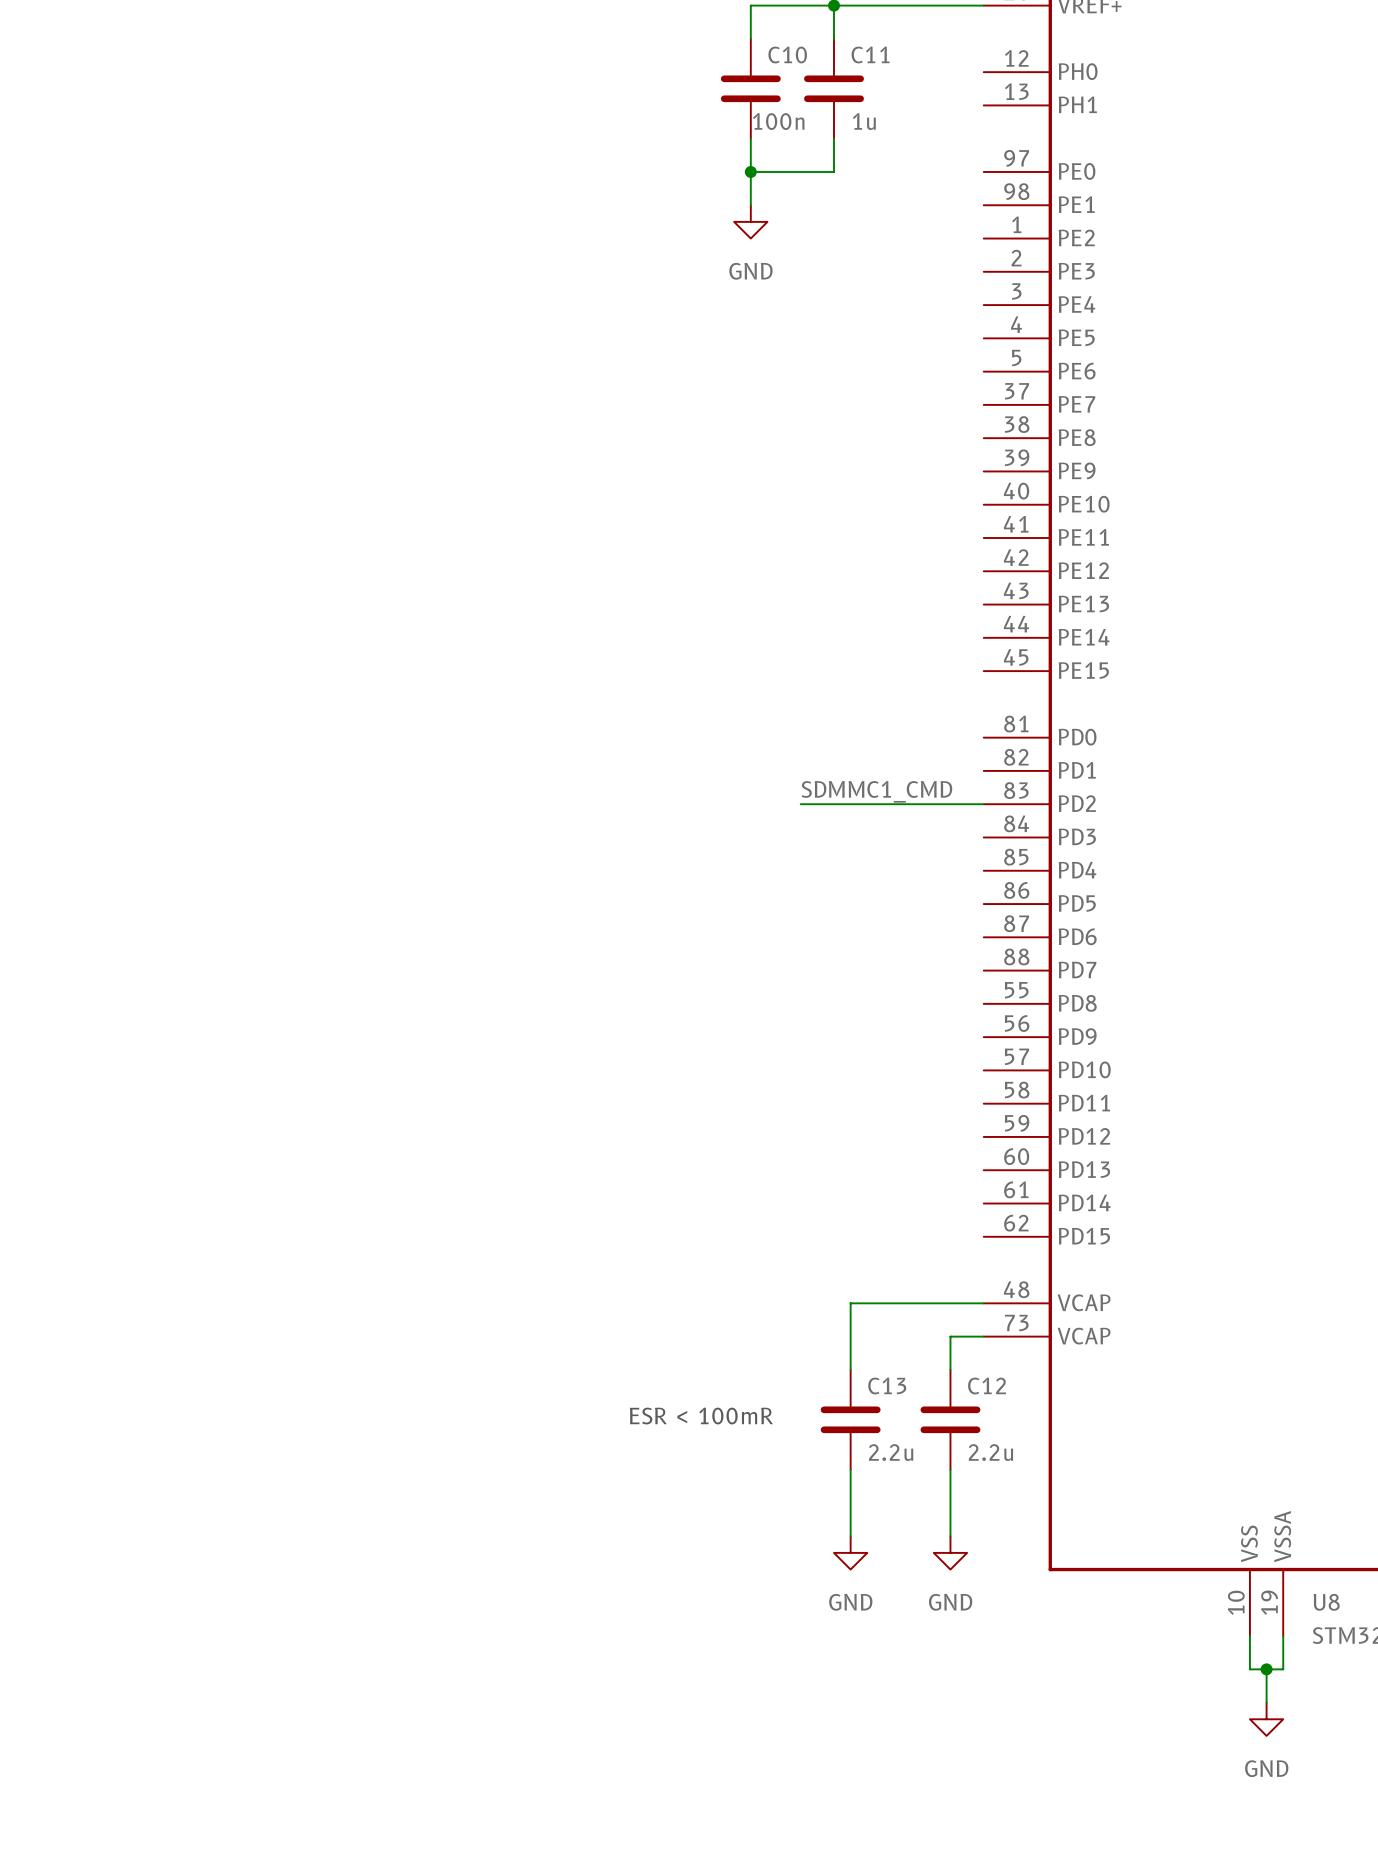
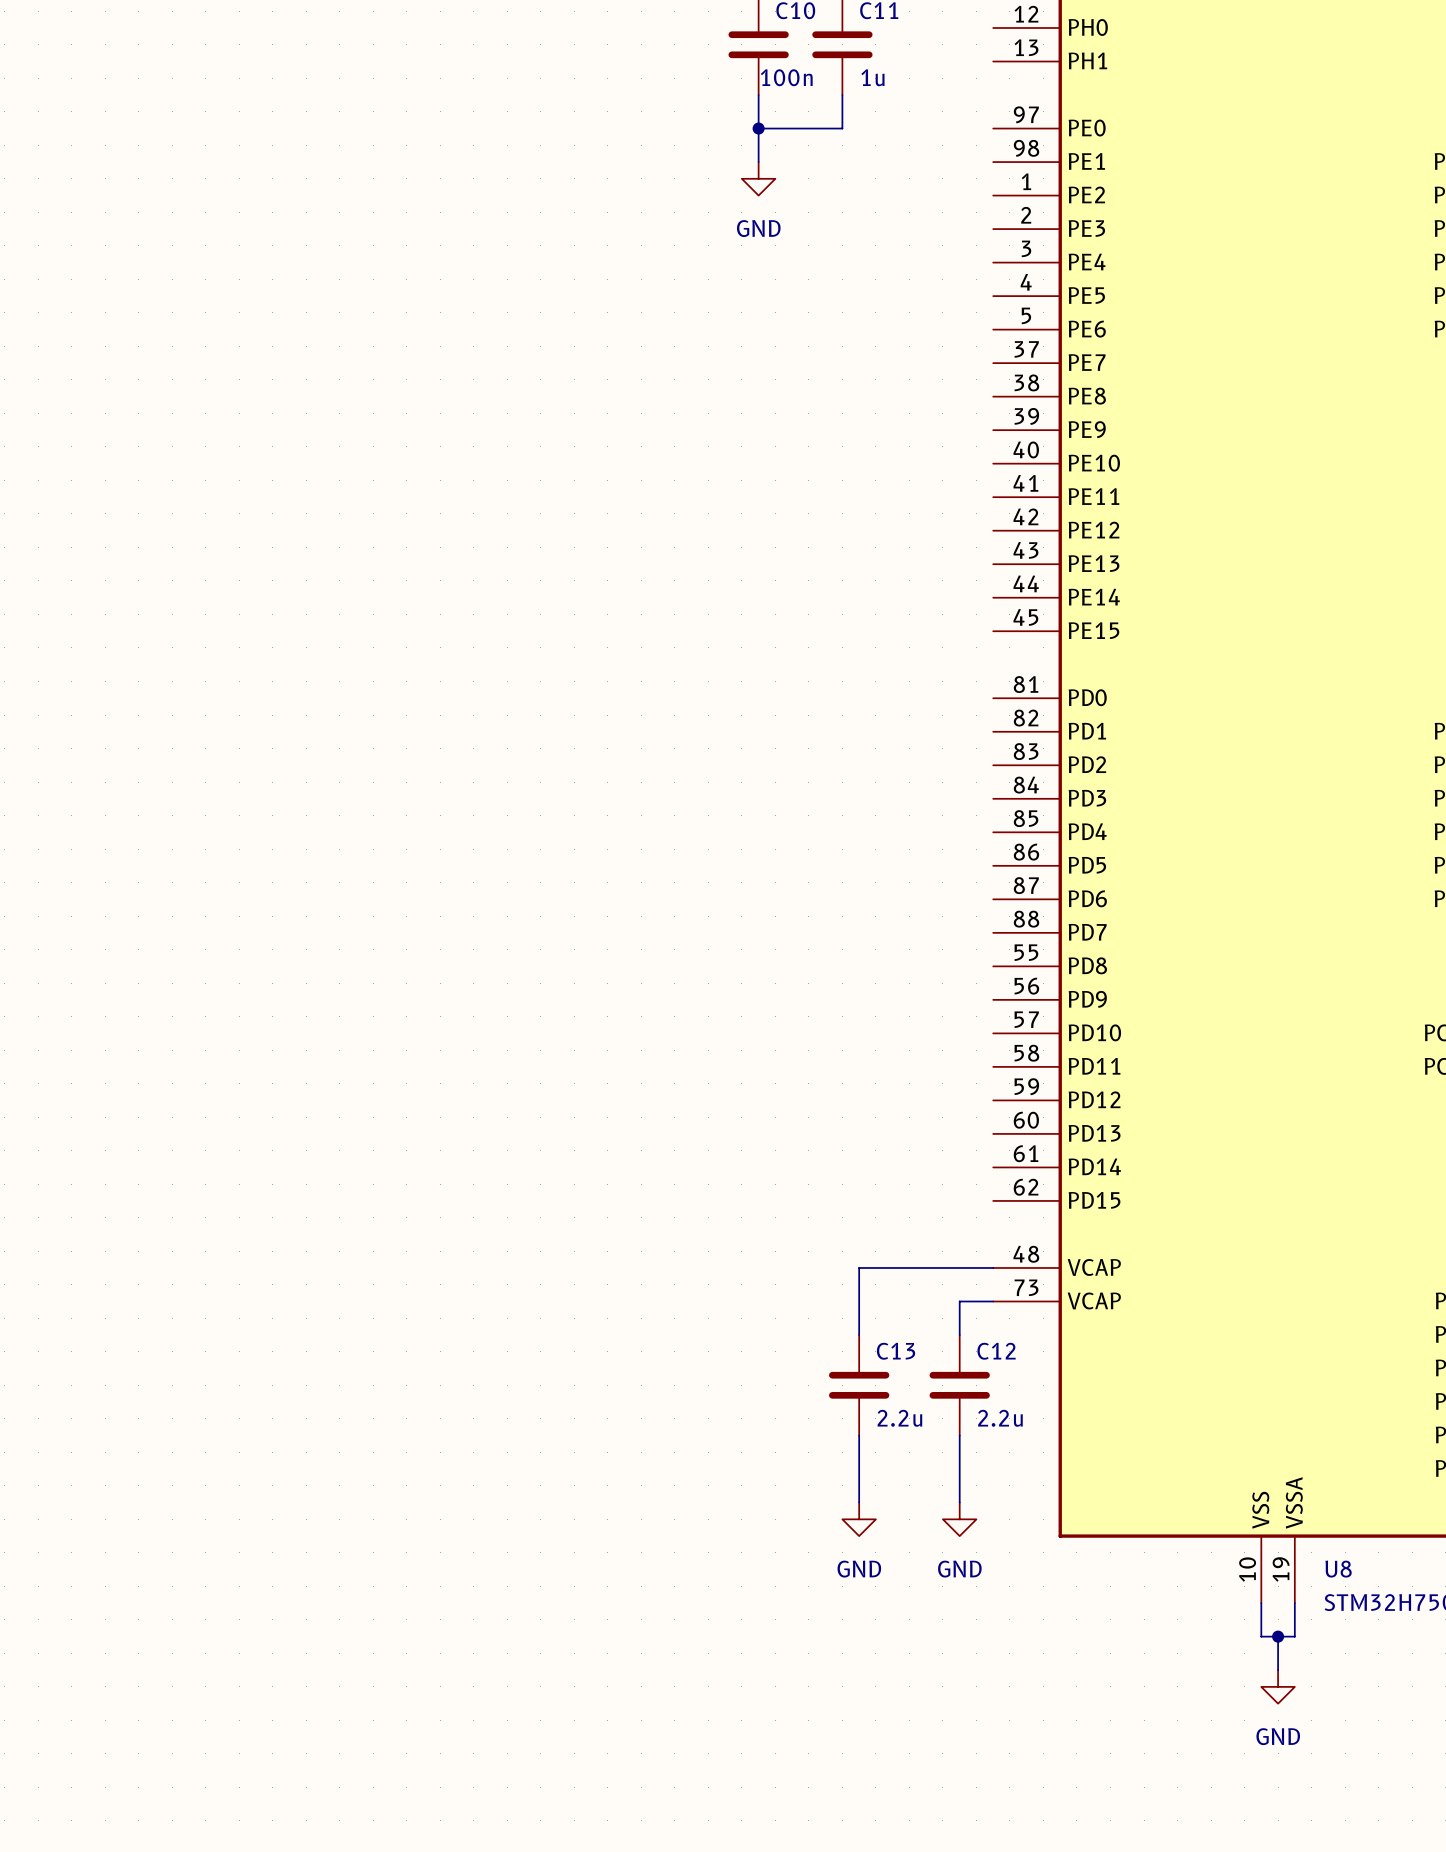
label: SDMMC1_CMD (876, 791) -> none
wire: (800, 804) (983, 804) -> none
text: ESR < 100mR (701, 1416) -> none

